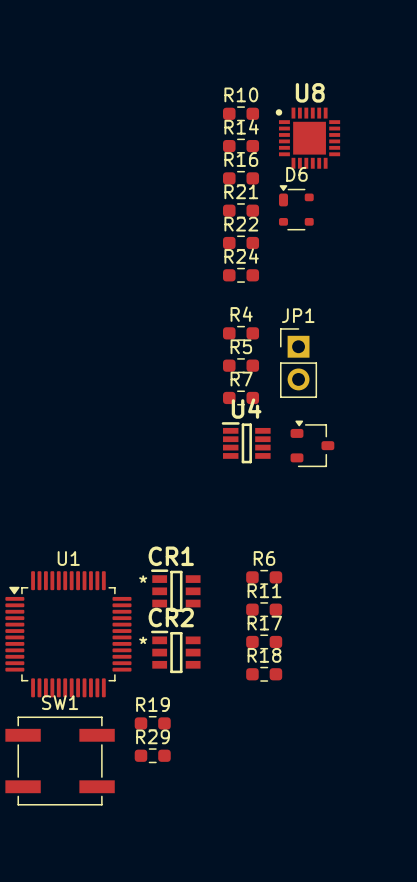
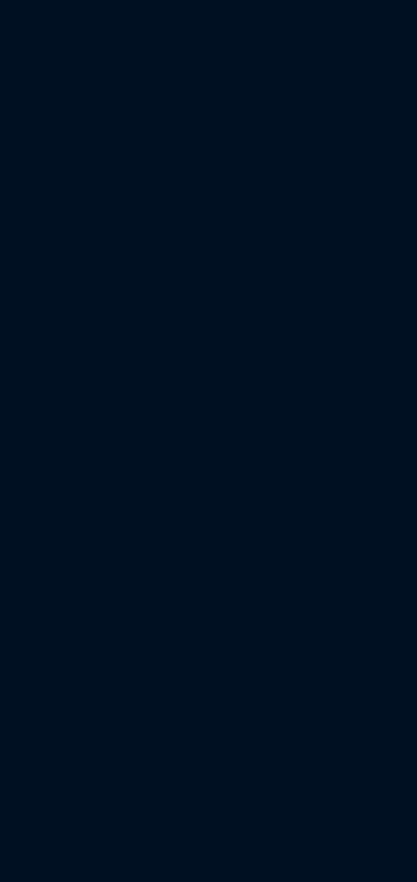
R10: (241, 113) -> none
U8: (307, 138) -> none
R14: (241, 146) -> none
R16: (241, 178) -> none
D6: (296, 207) -> none
R21: (241, 210) -> none
R22: (241, 243) -> none
R24: (241, 275) -> none
R4: (241, 333) -> none
JP1: (298, 363) -> none
R5: (241, 365) -> none
R7: (241, 397) -> none
U4: (246, 442) -> none
part: (312, 443) -> none
R6: (264, 577) -> none
CR1: (175, 590) -> none
R11: (264, 609) -> none
U1: (68, 634) -> none
R17: (264, 641) -> none
CR2: (175, 651) -> none
R18: (264, 674) -> none
R19: (152, 723) -> none
R29: (152, 755) -> none
SW1: (60, 761) -> none

